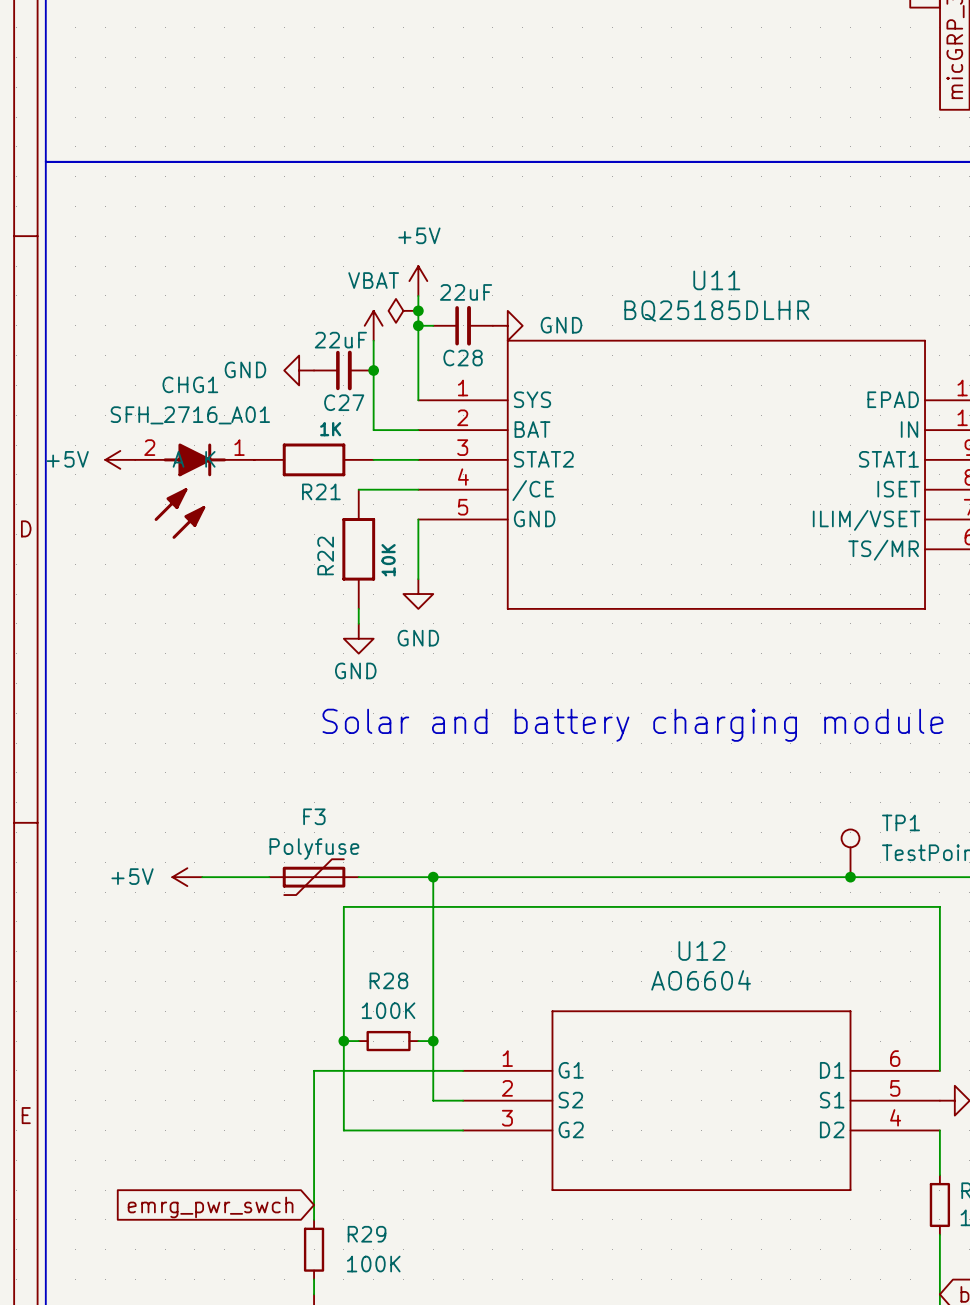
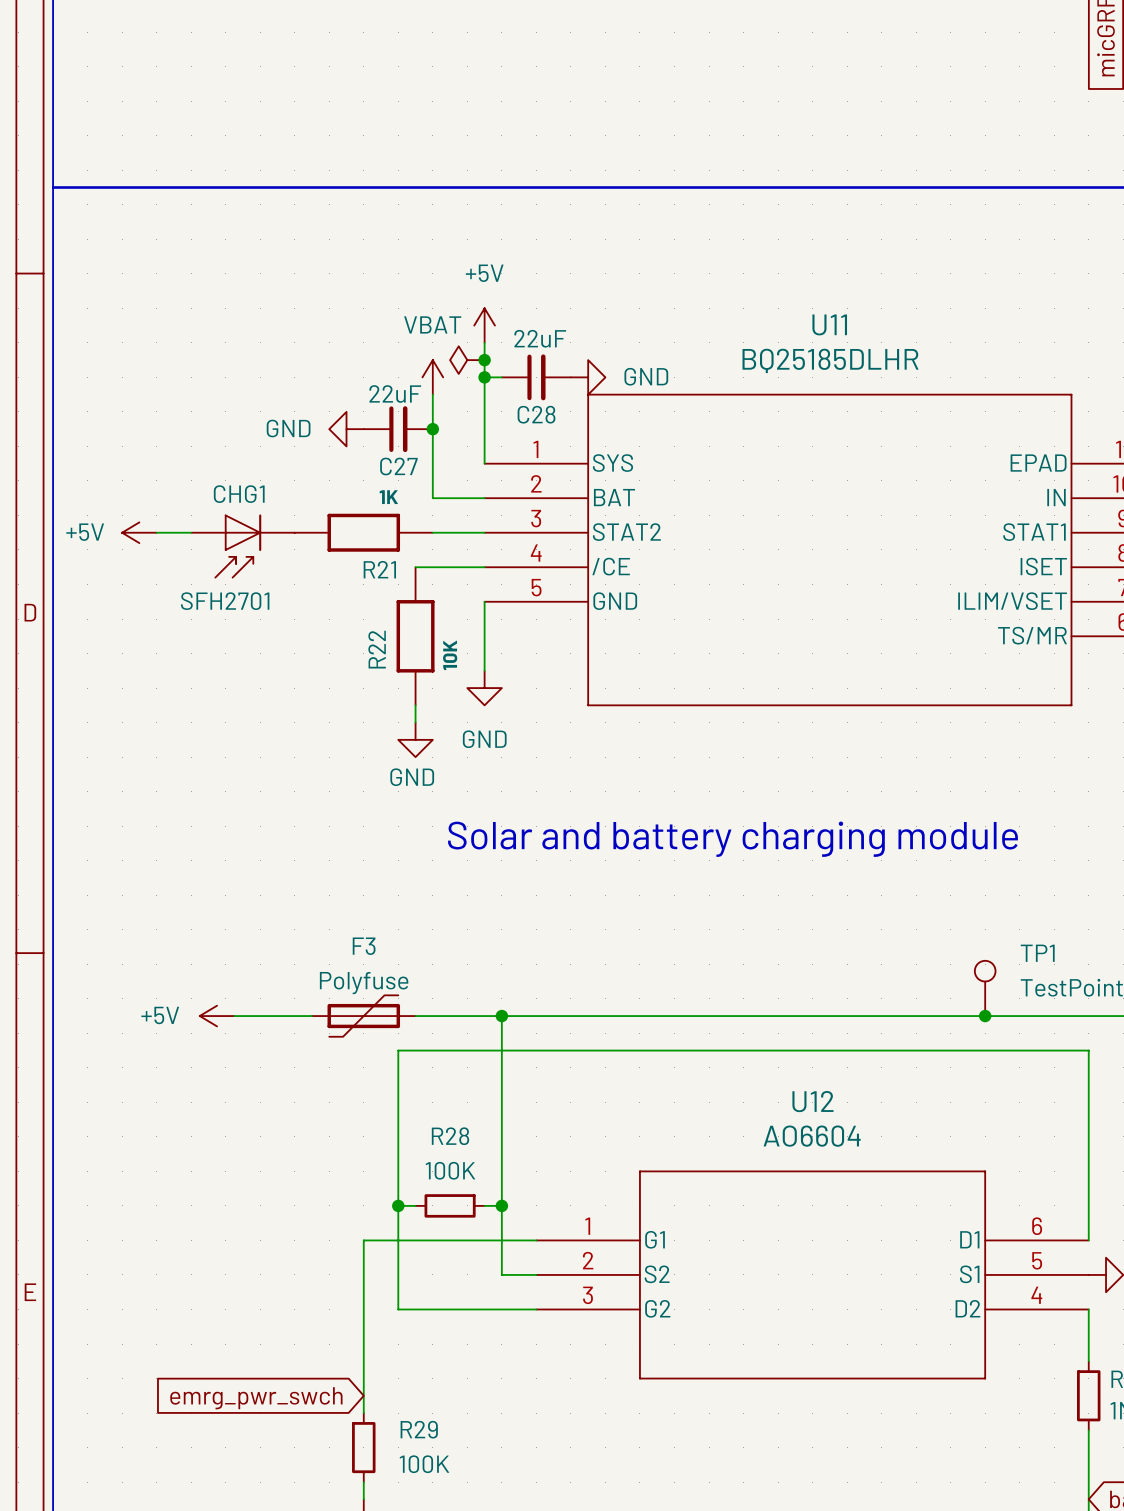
CHG1 name position: CHG1 (190, 384) -> CHG1 (239, 494)
CHG1 value: SFH_2716_A01 (190, 415) -> SFH2701 (225, 601)
CHG1 symbol: [135, 443, 255, 539] -> [191, 514, 295, 578]

